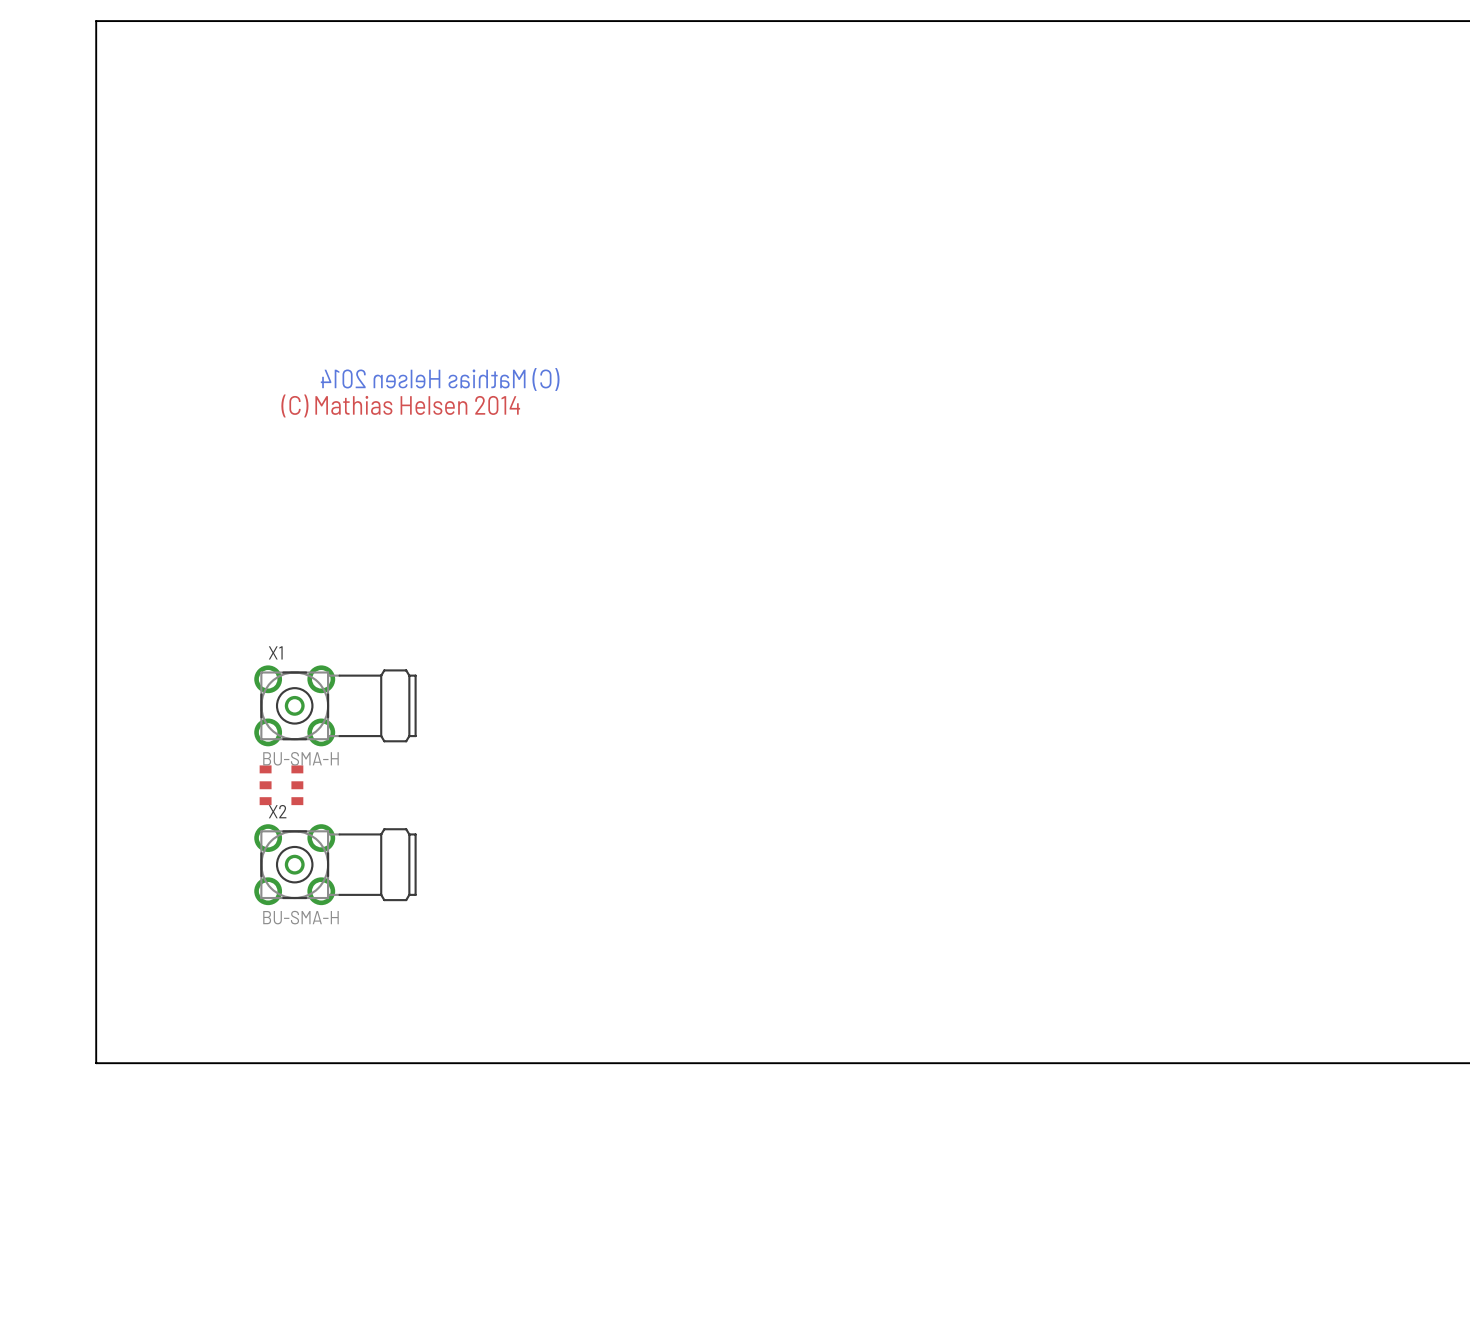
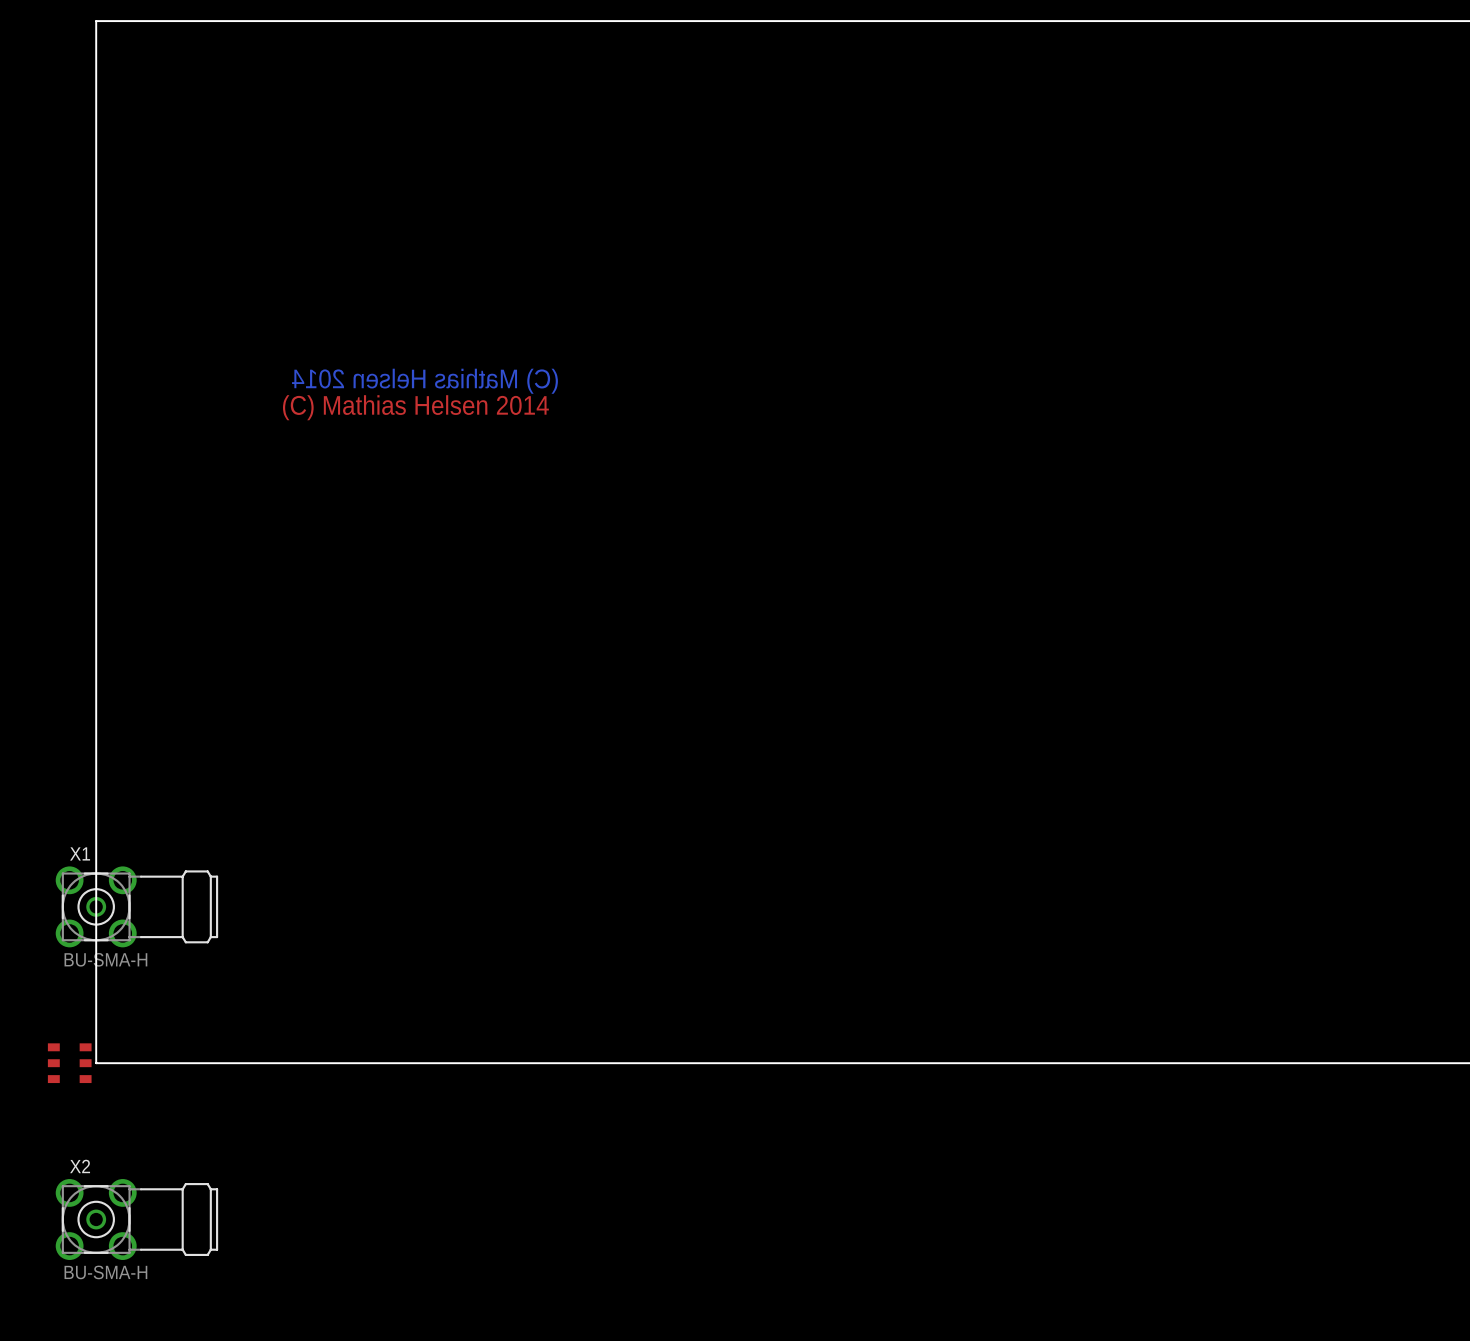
X1 position: (335, 705) -> (136, 906)
part: (281, 785) -> none
X2 position: (335, 864) -> (136, 1219)
part: none -> (69, 1063)

